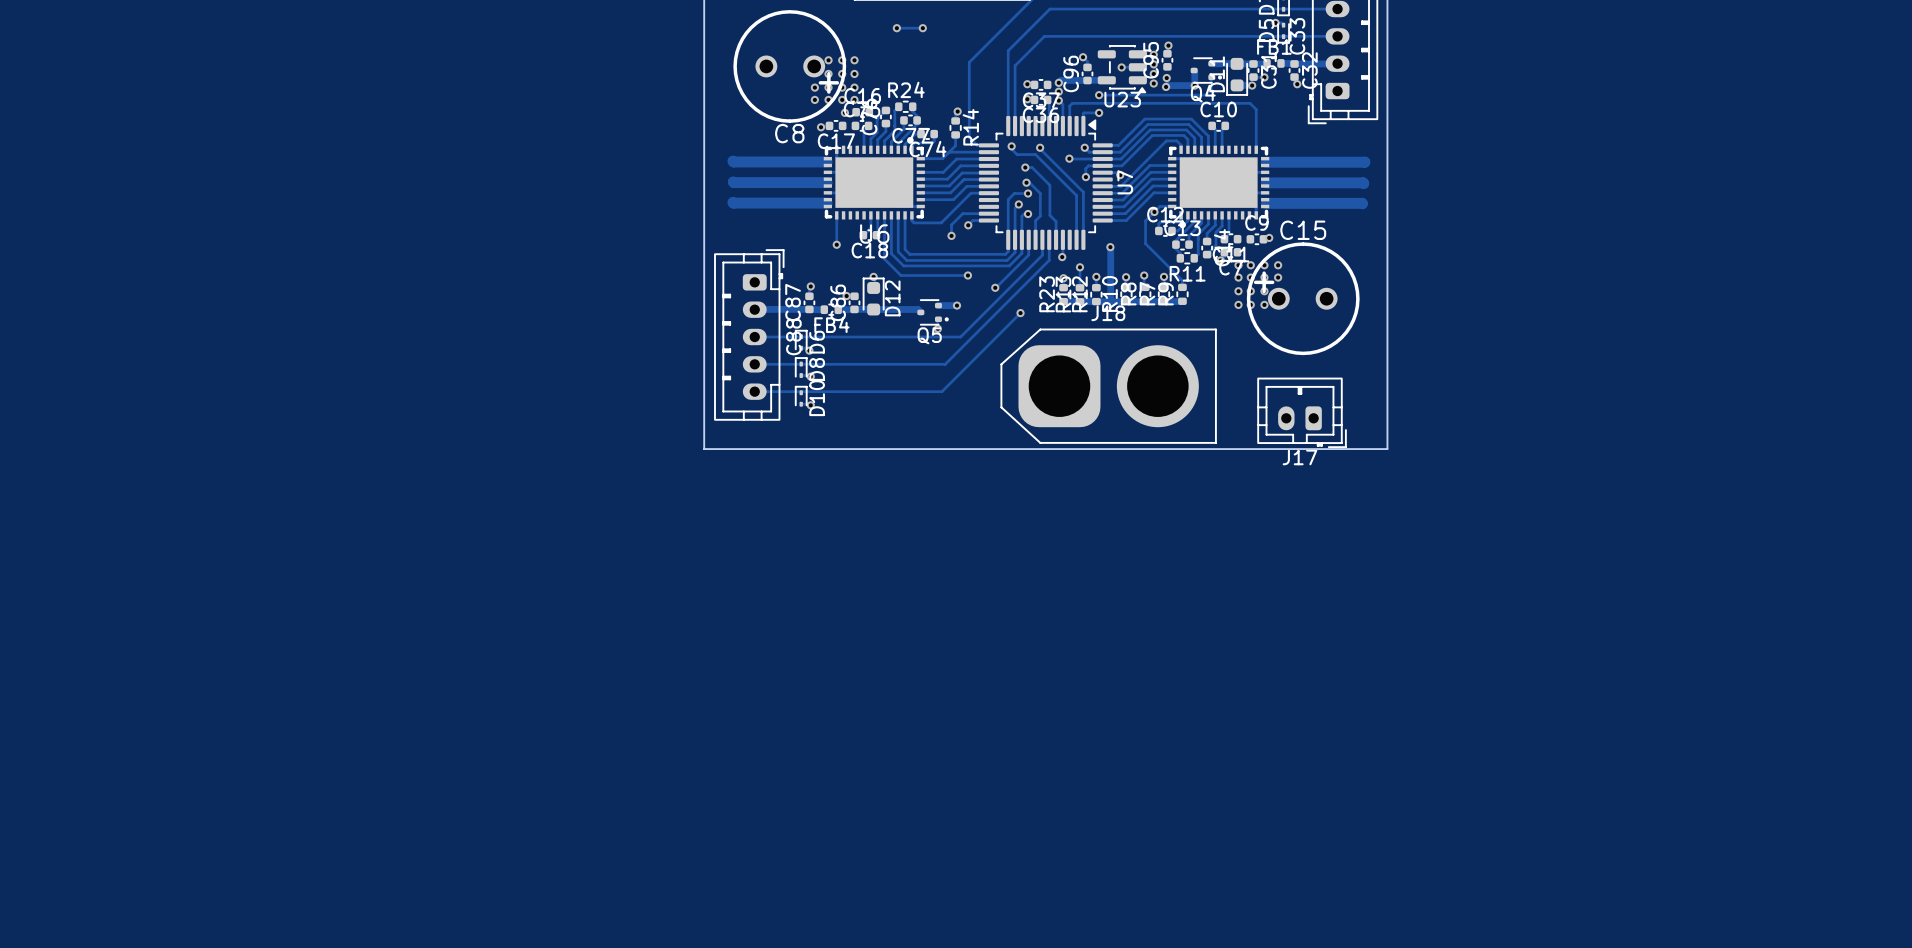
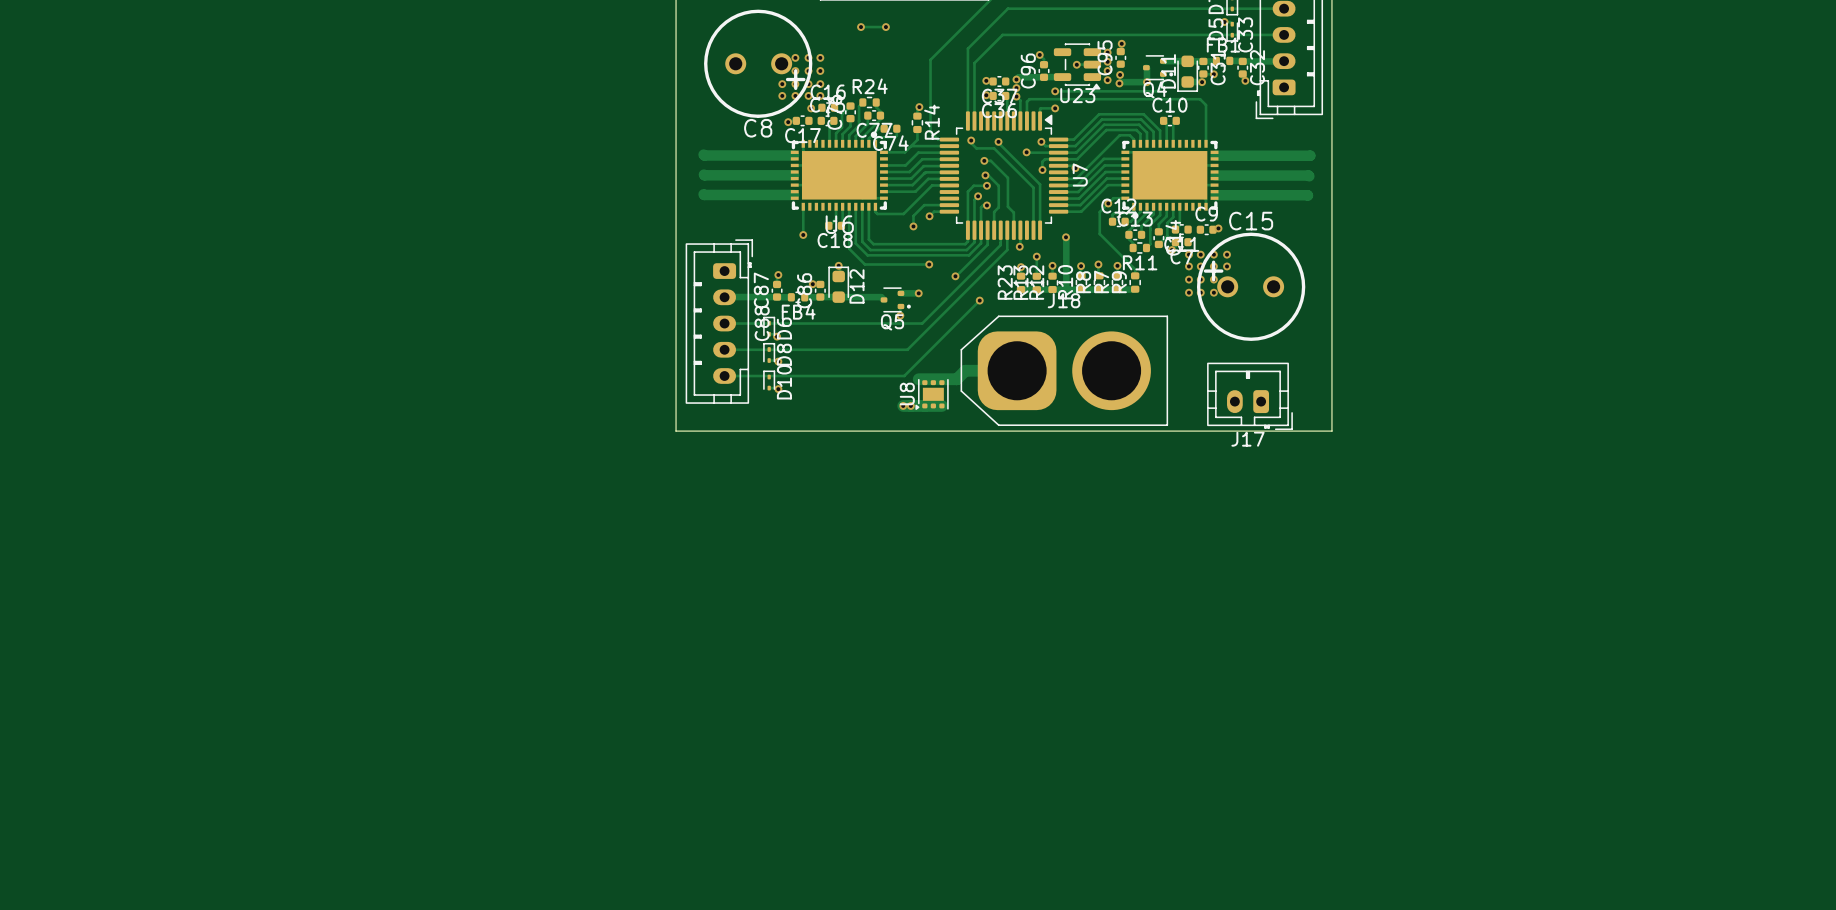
track: none -> (1017, 370) (965, 370) (956, 379) (918, 379)
U8: none -> (932, 394)
track: none -> (903, 405) (941, 405)
via: none -> (903, 405)
via: none -> (910, 405)

